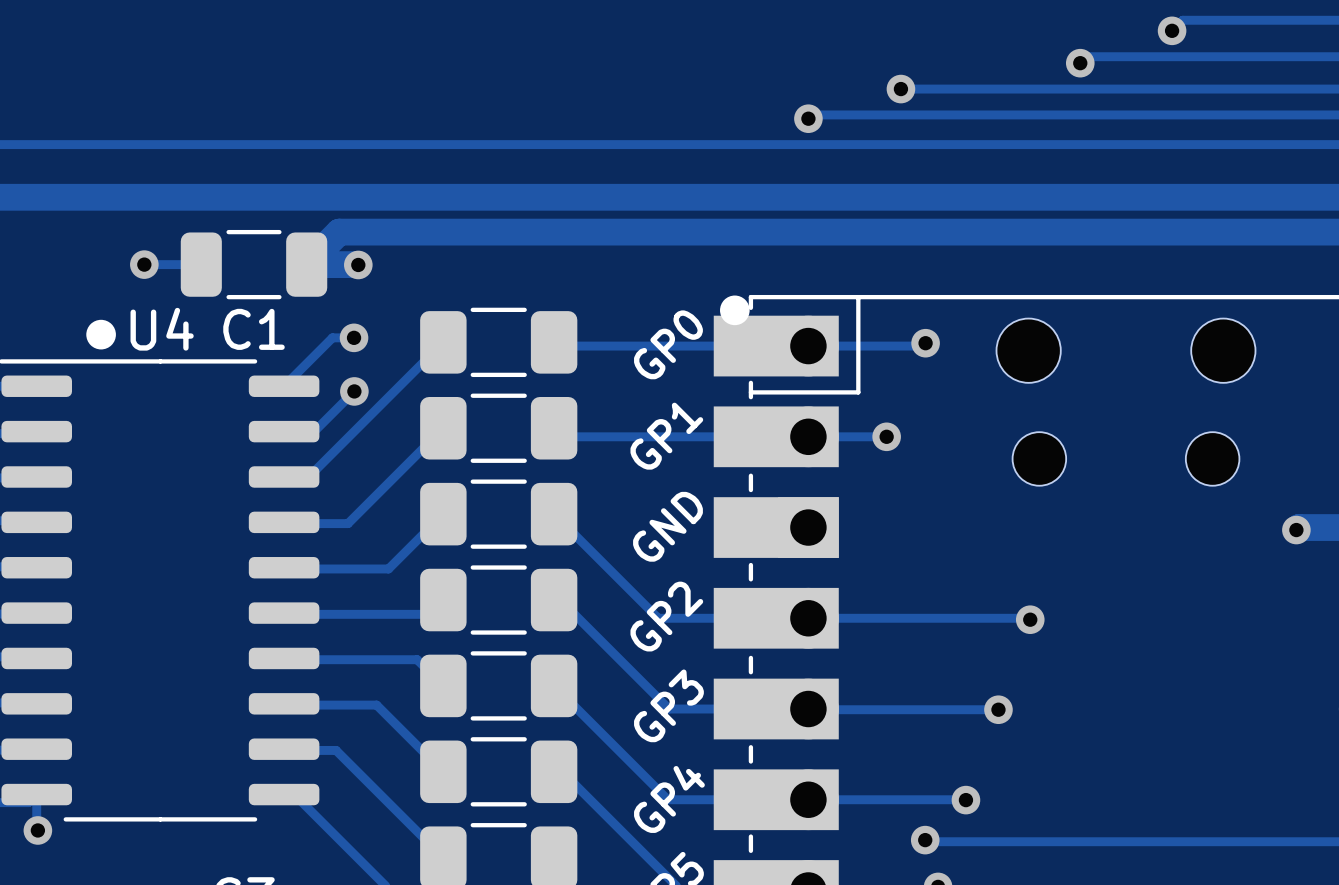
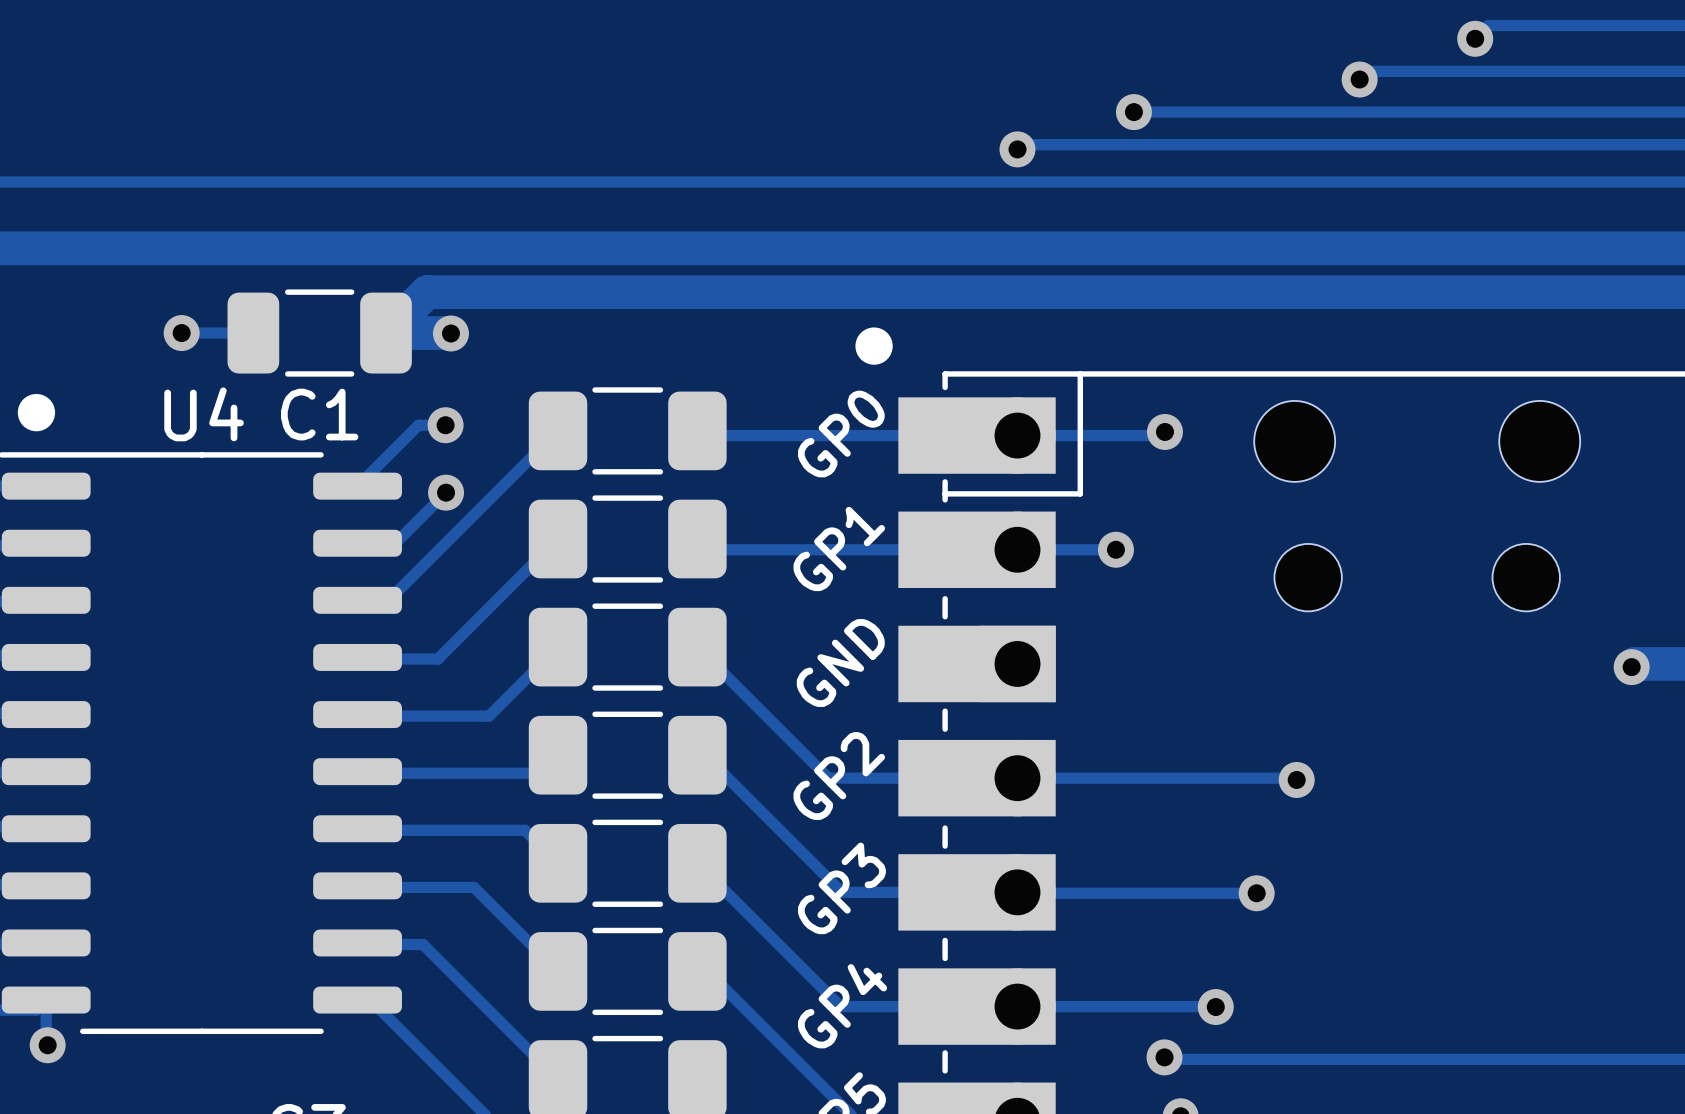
drawing position: (734, 310) -> (874, 346)
drawing position: (101, 334) -> (36, 412)

